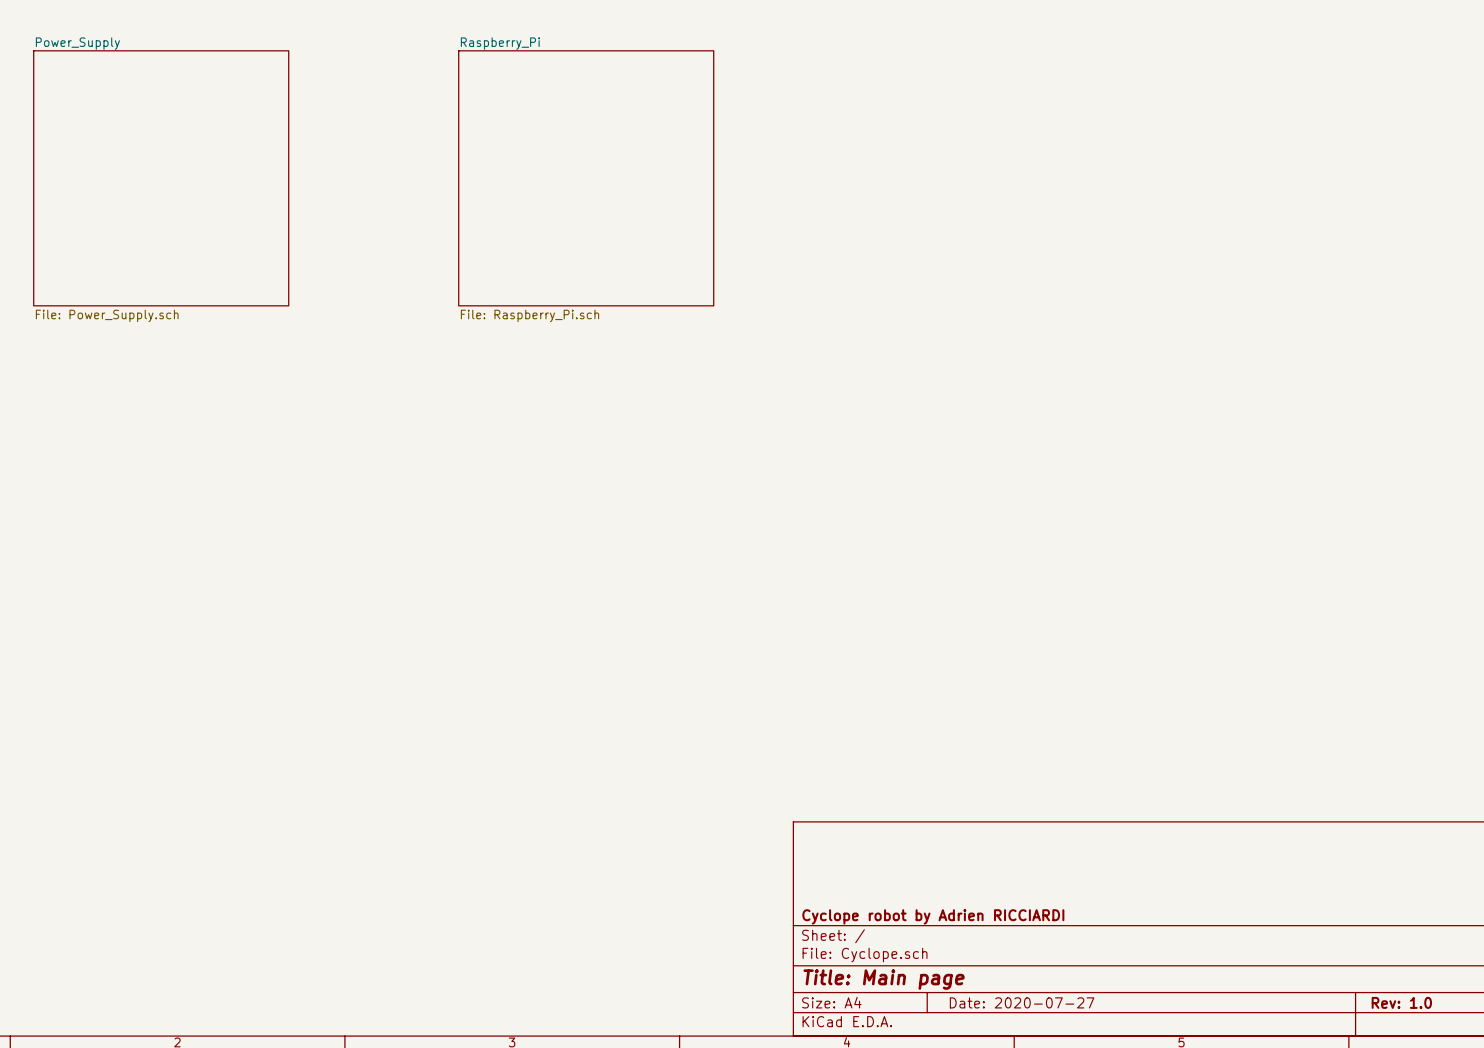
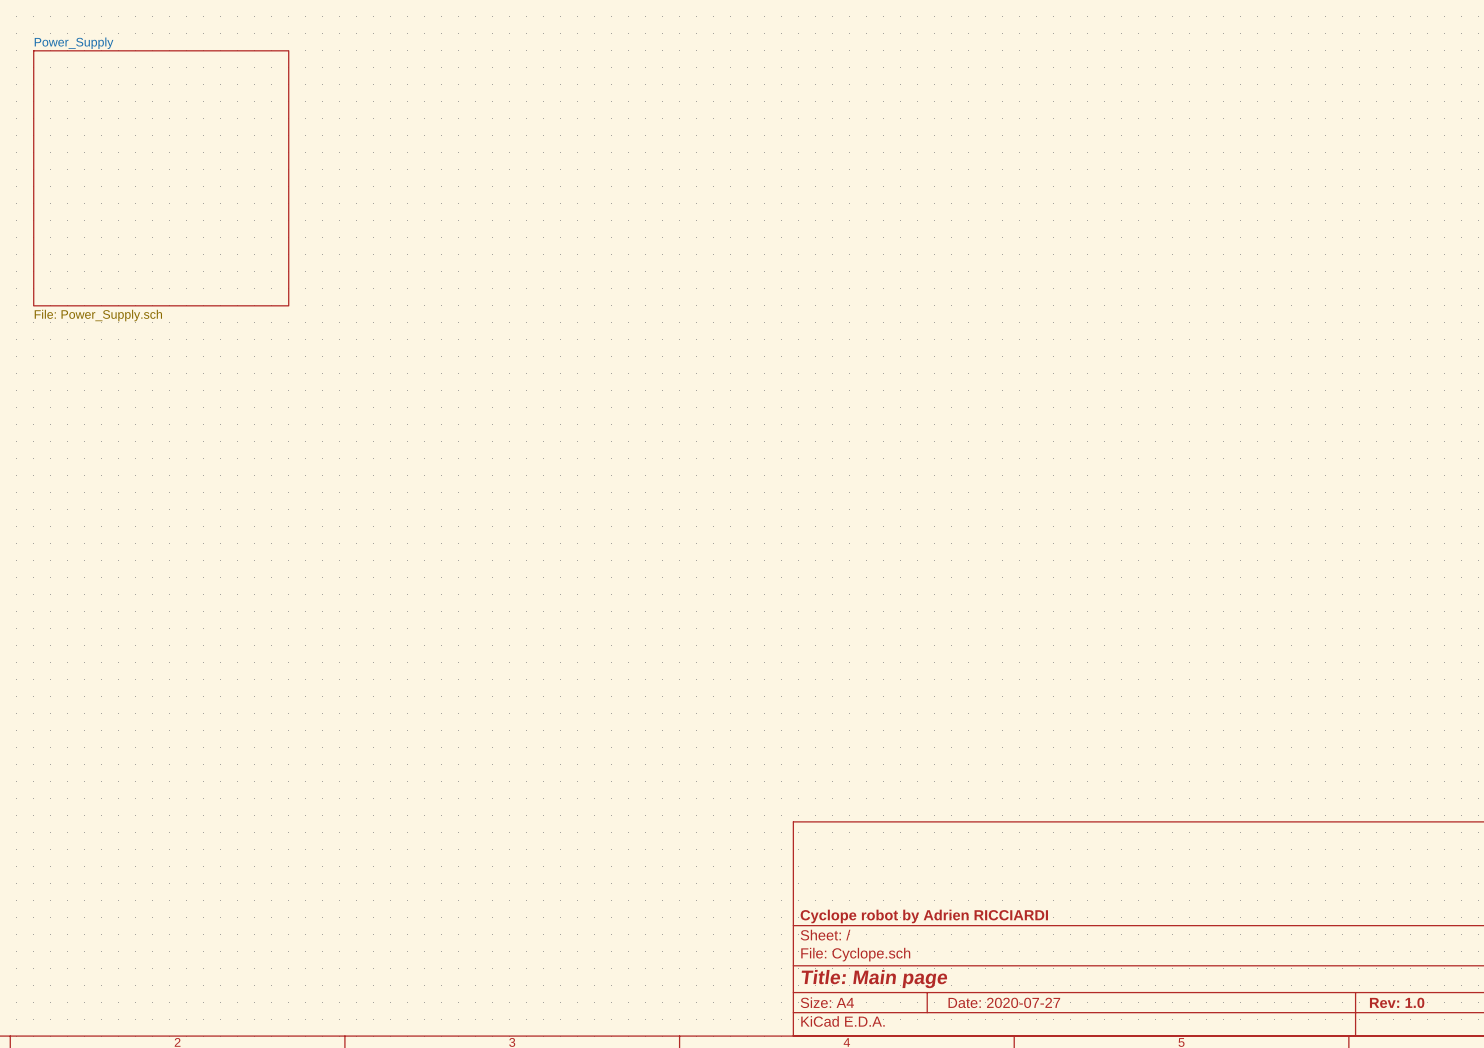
sheet Raspberry_Pi: File: Raspberry_Pi.sch (586, 178) -> none

